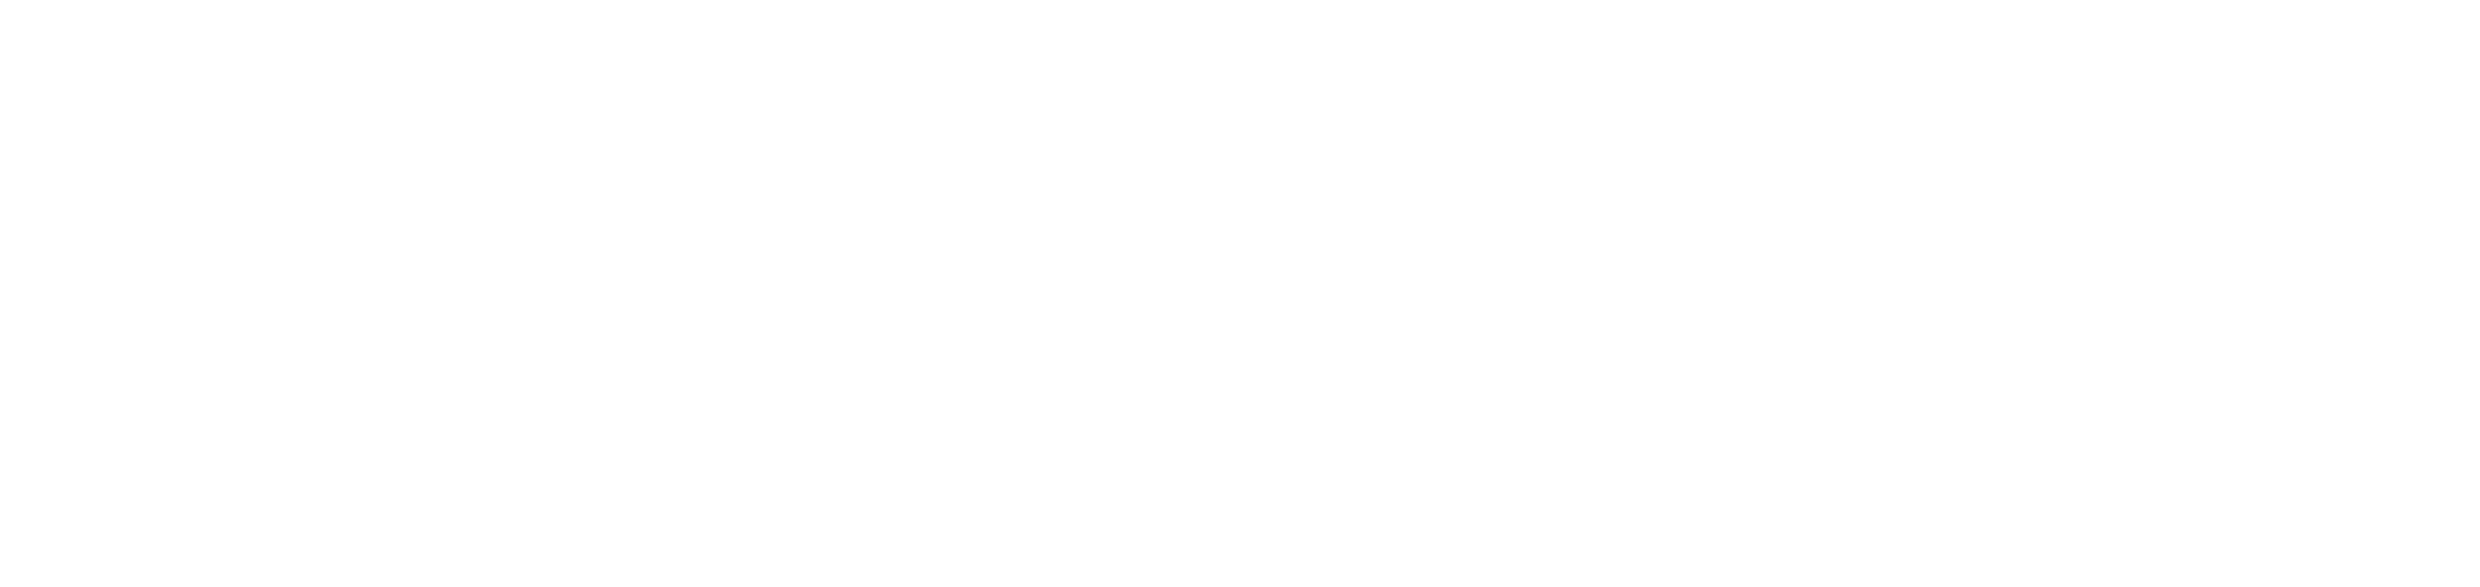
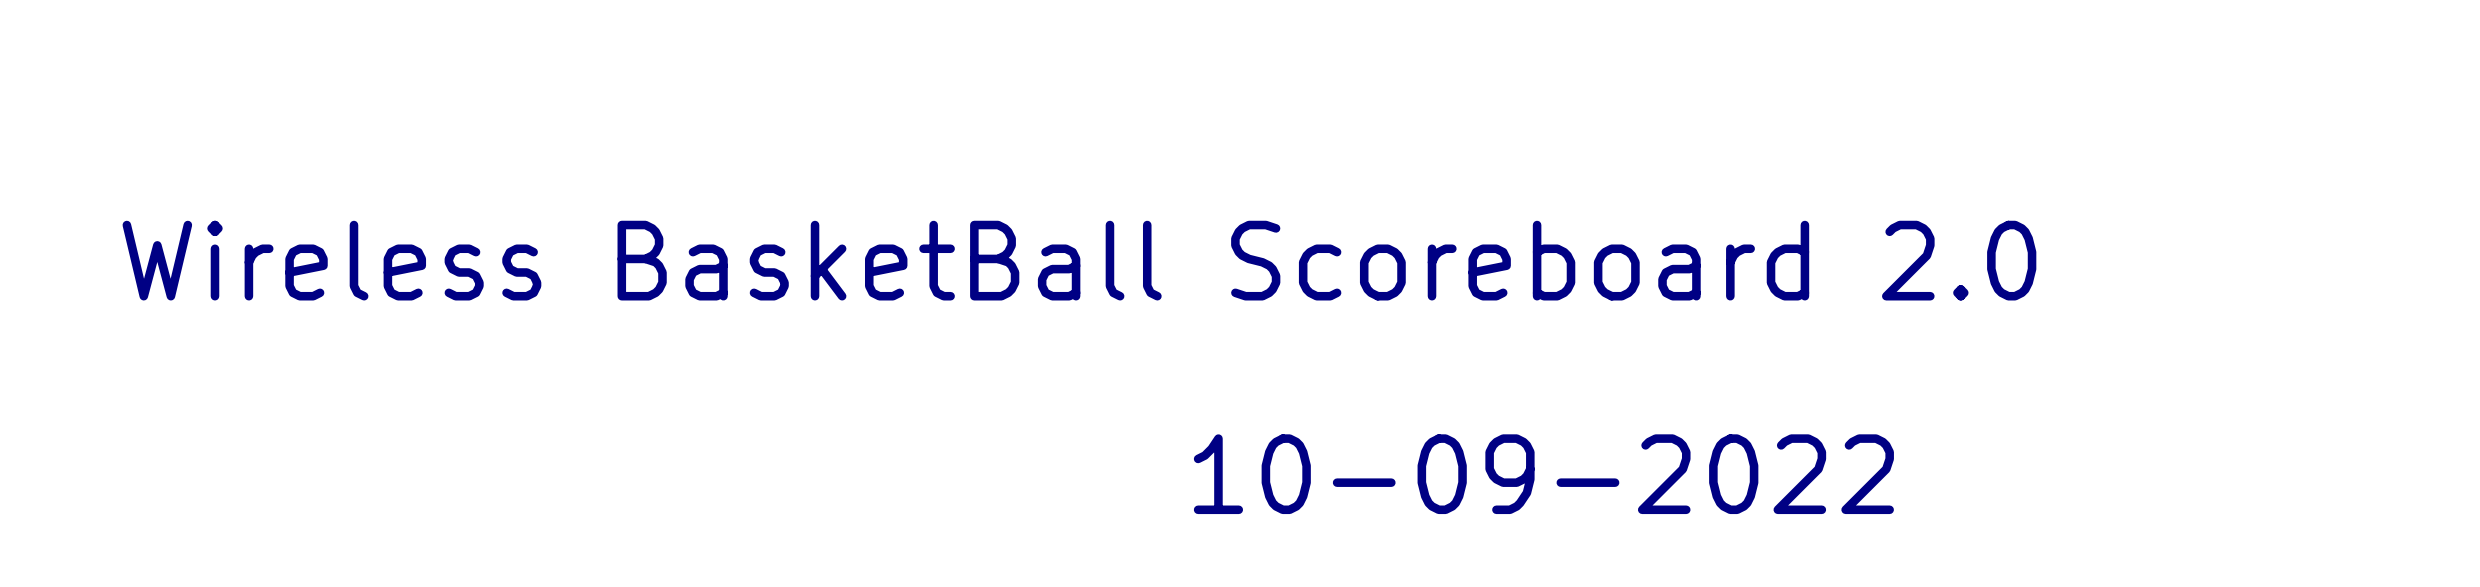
text: none -> Wireless BasketBall Scoreboard 2.0 (1079, 260)
text: none -> 10-09-2022 (1543, 474)

